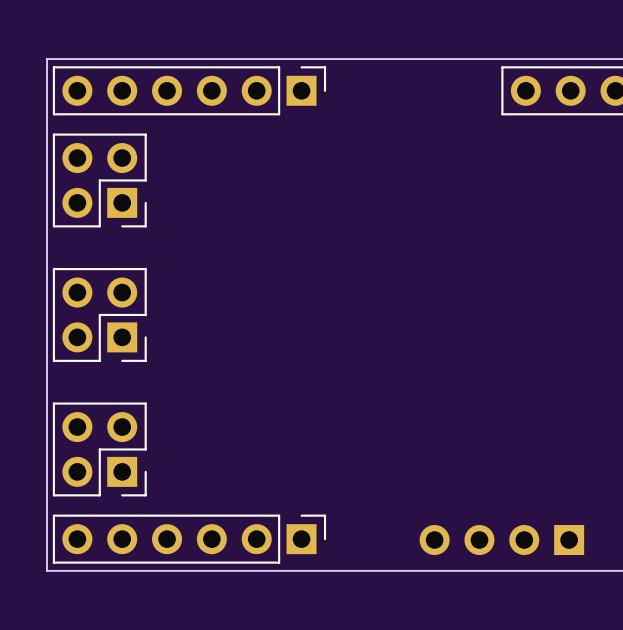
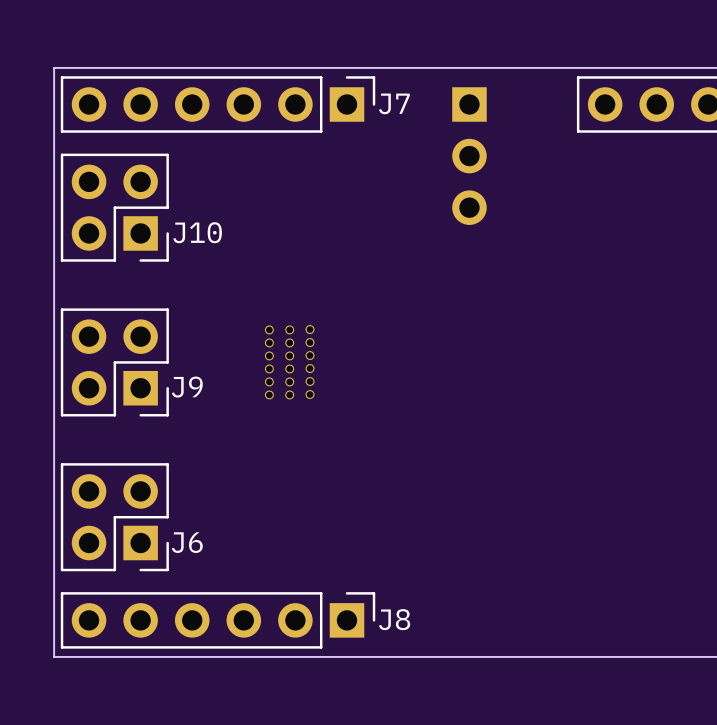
J7 name: none -> J7 (394, 103)
part: none -> (469, 156)
J10 name: none -> J10 (197, 232)
part: none -> (289, 362)
J9 name: none -> J9 (187, 387)
J6 name: none -> J6 (187, 542)
J8 name: none -> J8 (394, 619)
part: (501, 540) -> none

